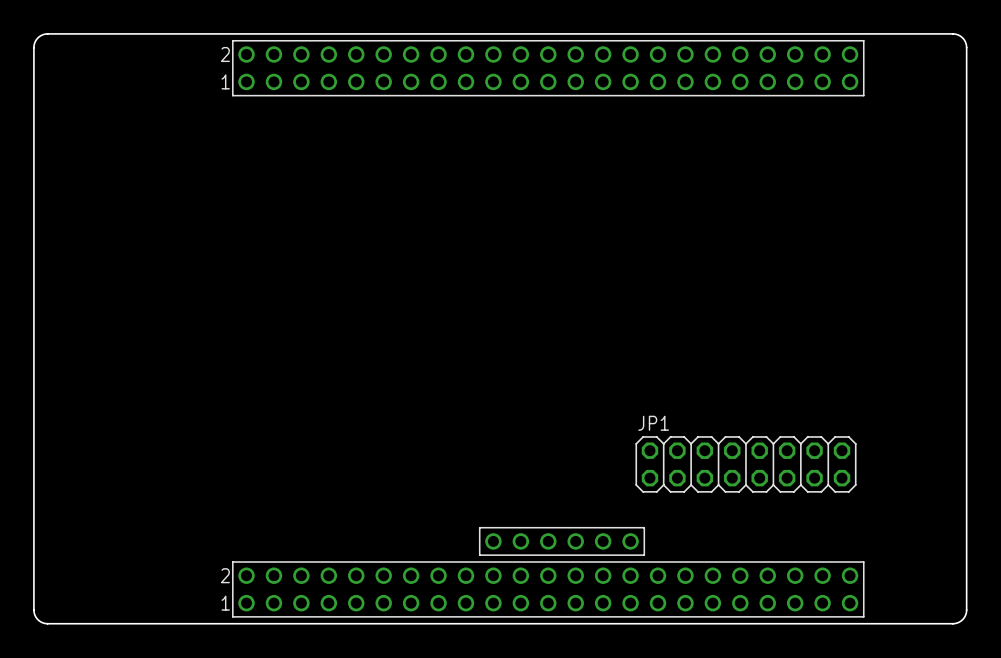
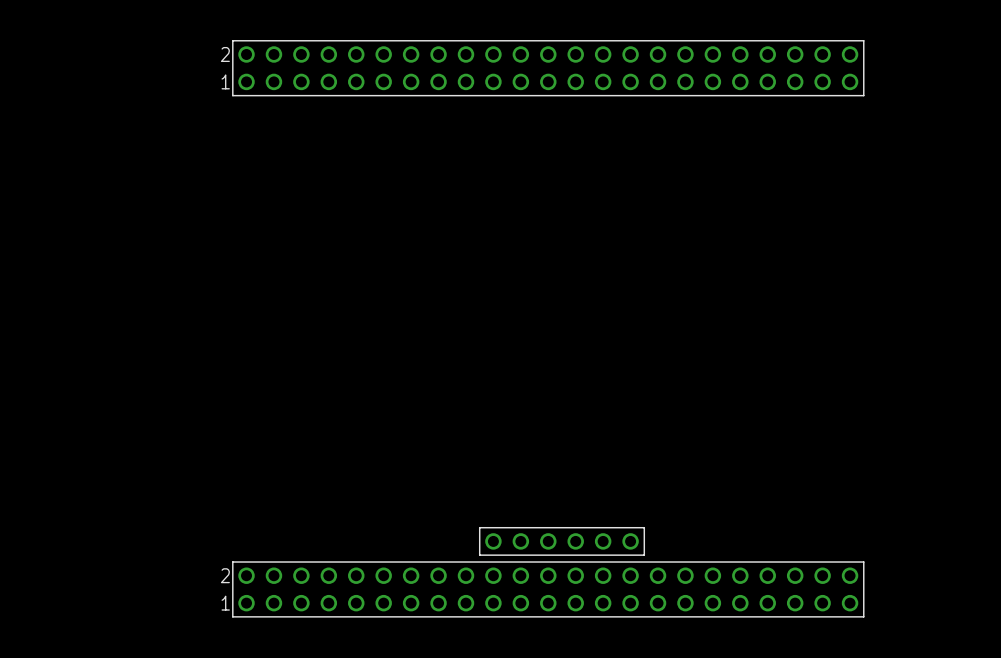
board edge: (47, 33) (952, 33) (959, 35) (964, 40) (966, 47) (966, 610) (964, 616) (959, 621) (952, 623) (47, 623) (40, 621) (35, 616) (33, 610) (33, 47) (37, 37) (47, 33) -> none
JP1: (745, 464) -> none

